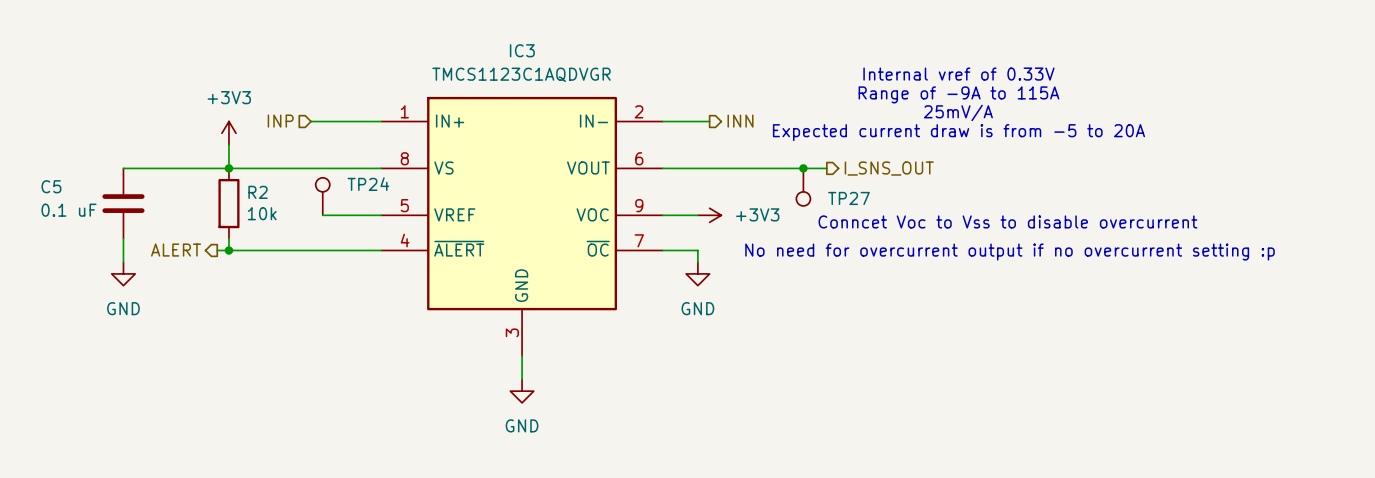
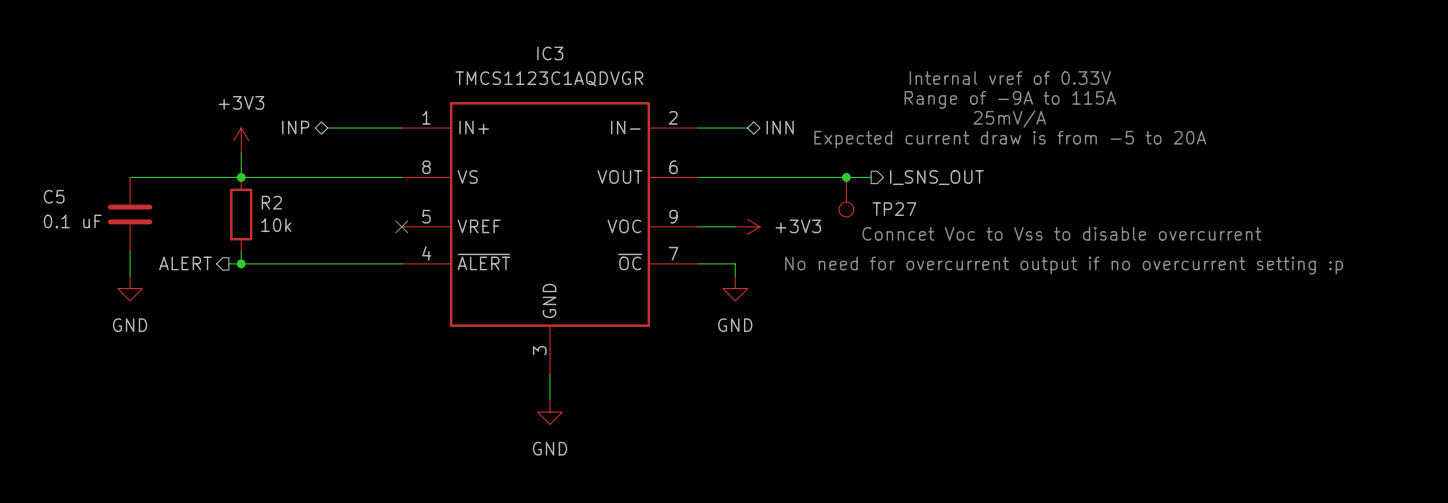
hierarchical label shape: input (280, 121) -> bidirectional (295, 127)
hierarchical label shape: output (740, 121) -> bidirectional (780, 127)
TP24: (322, 196) -> none
wire: (322, 215) (381, 215) -> none
no-connect mark: none -> (401, 226)

